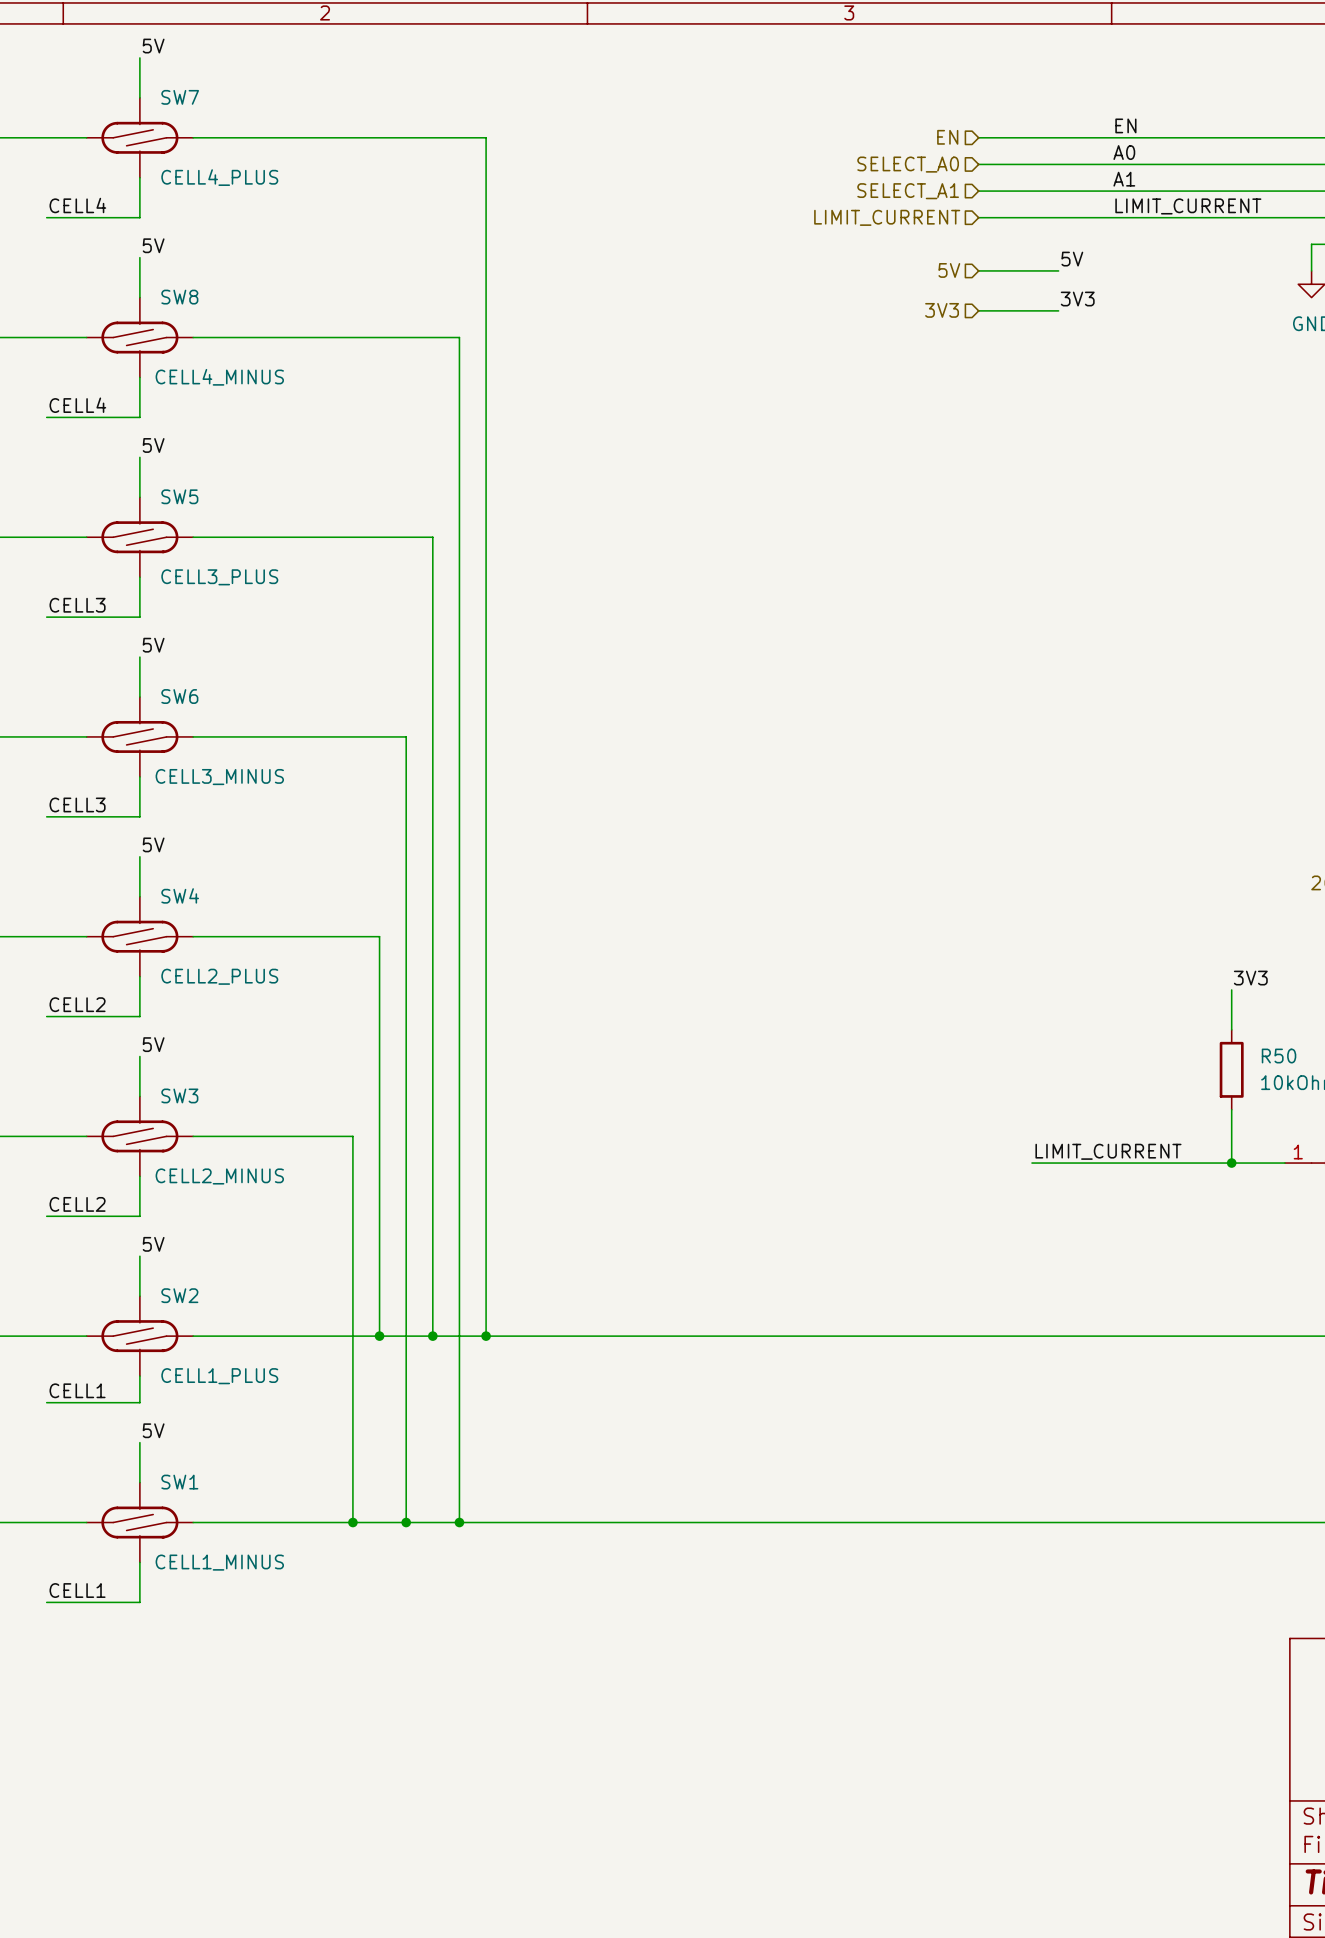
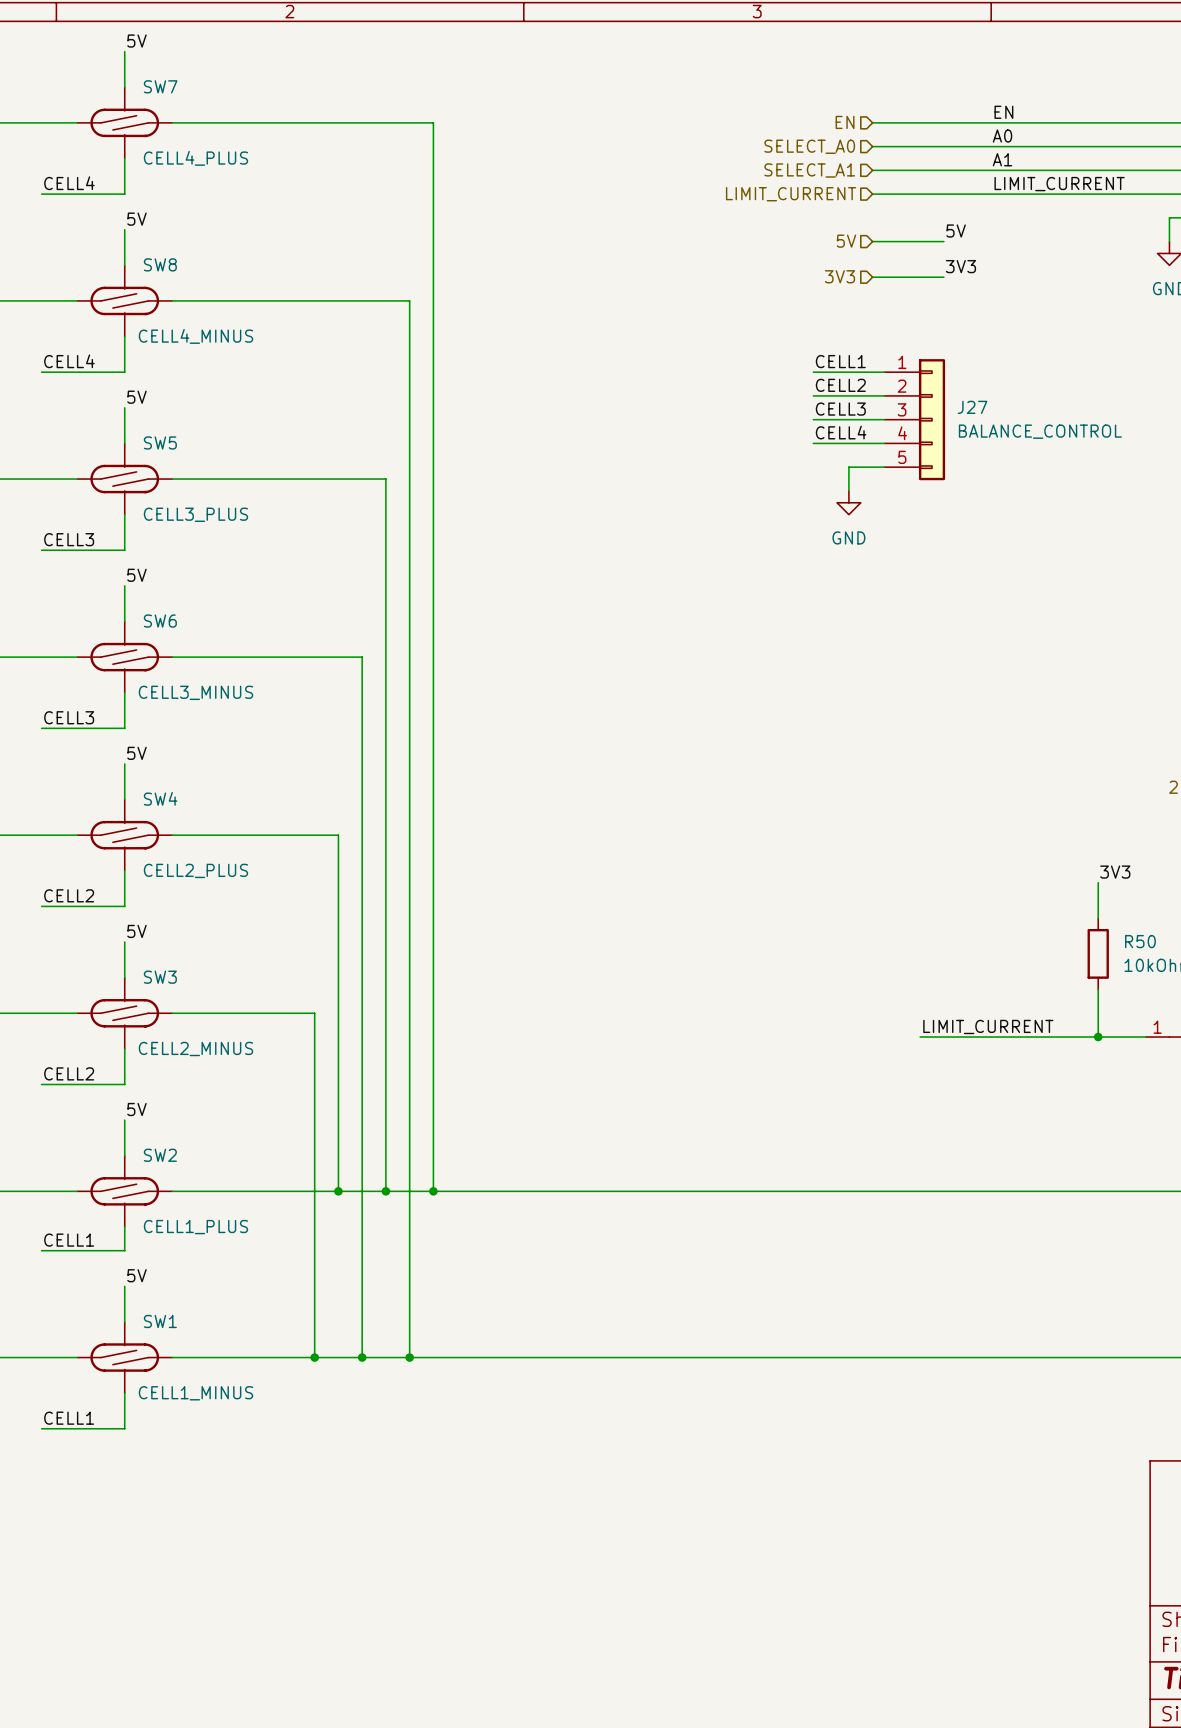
label: none -> CELL1 (840, 361)
wire: none -> (813, 372) (884, 372)
label: none -> CELL2 (840, 385)
wire: none -> (813, 395) (884, 395)
label: none -> CELL3 (840, 409)
wire: none -> (813, 419) (884, 419)
J27: none -> BALANCE_CONTROL (914, 419)
label: none -> CELL4 (841, 432)
wire: none -> (813, 443) (884, 443)
wire: none -> (884, 467) (848, 467) (848, 490)
power symbol: none -> GND (848, 502)

